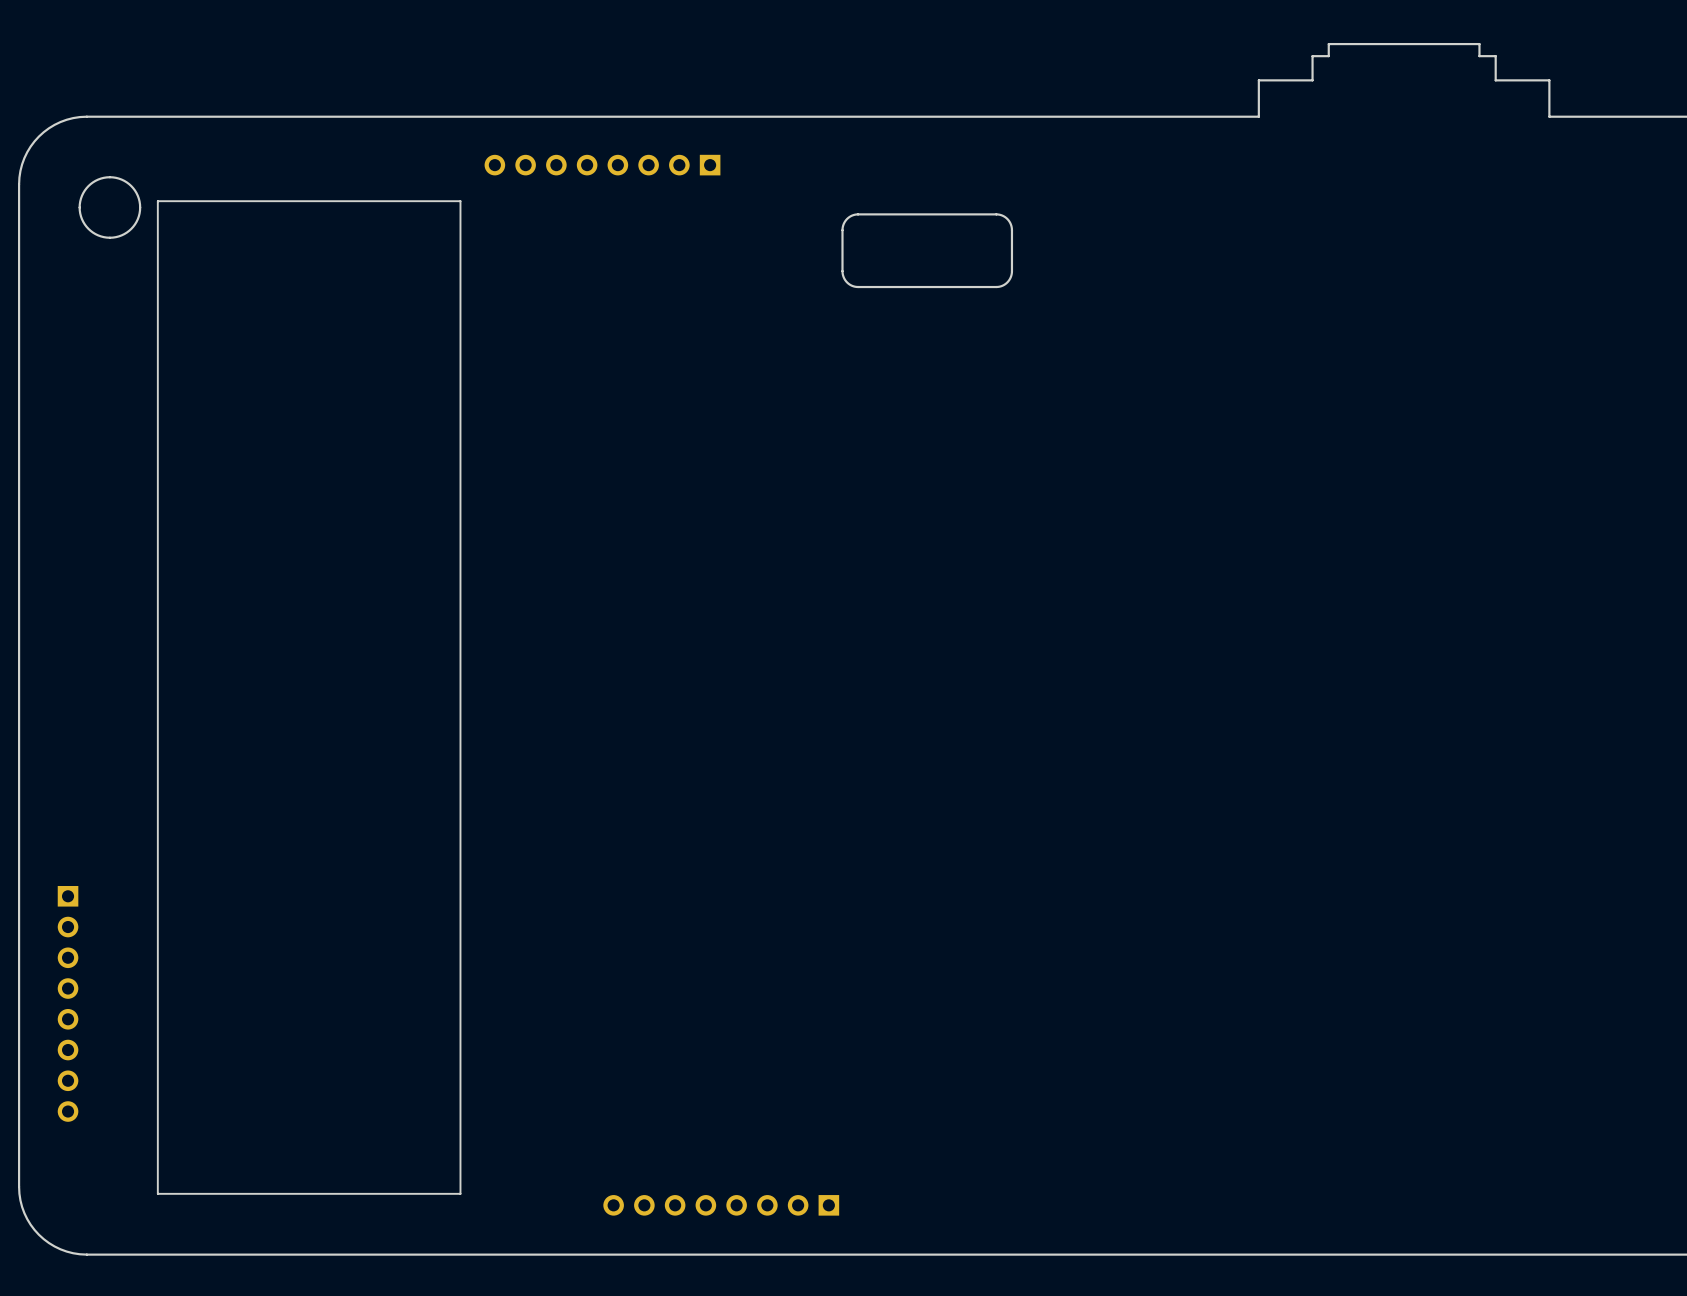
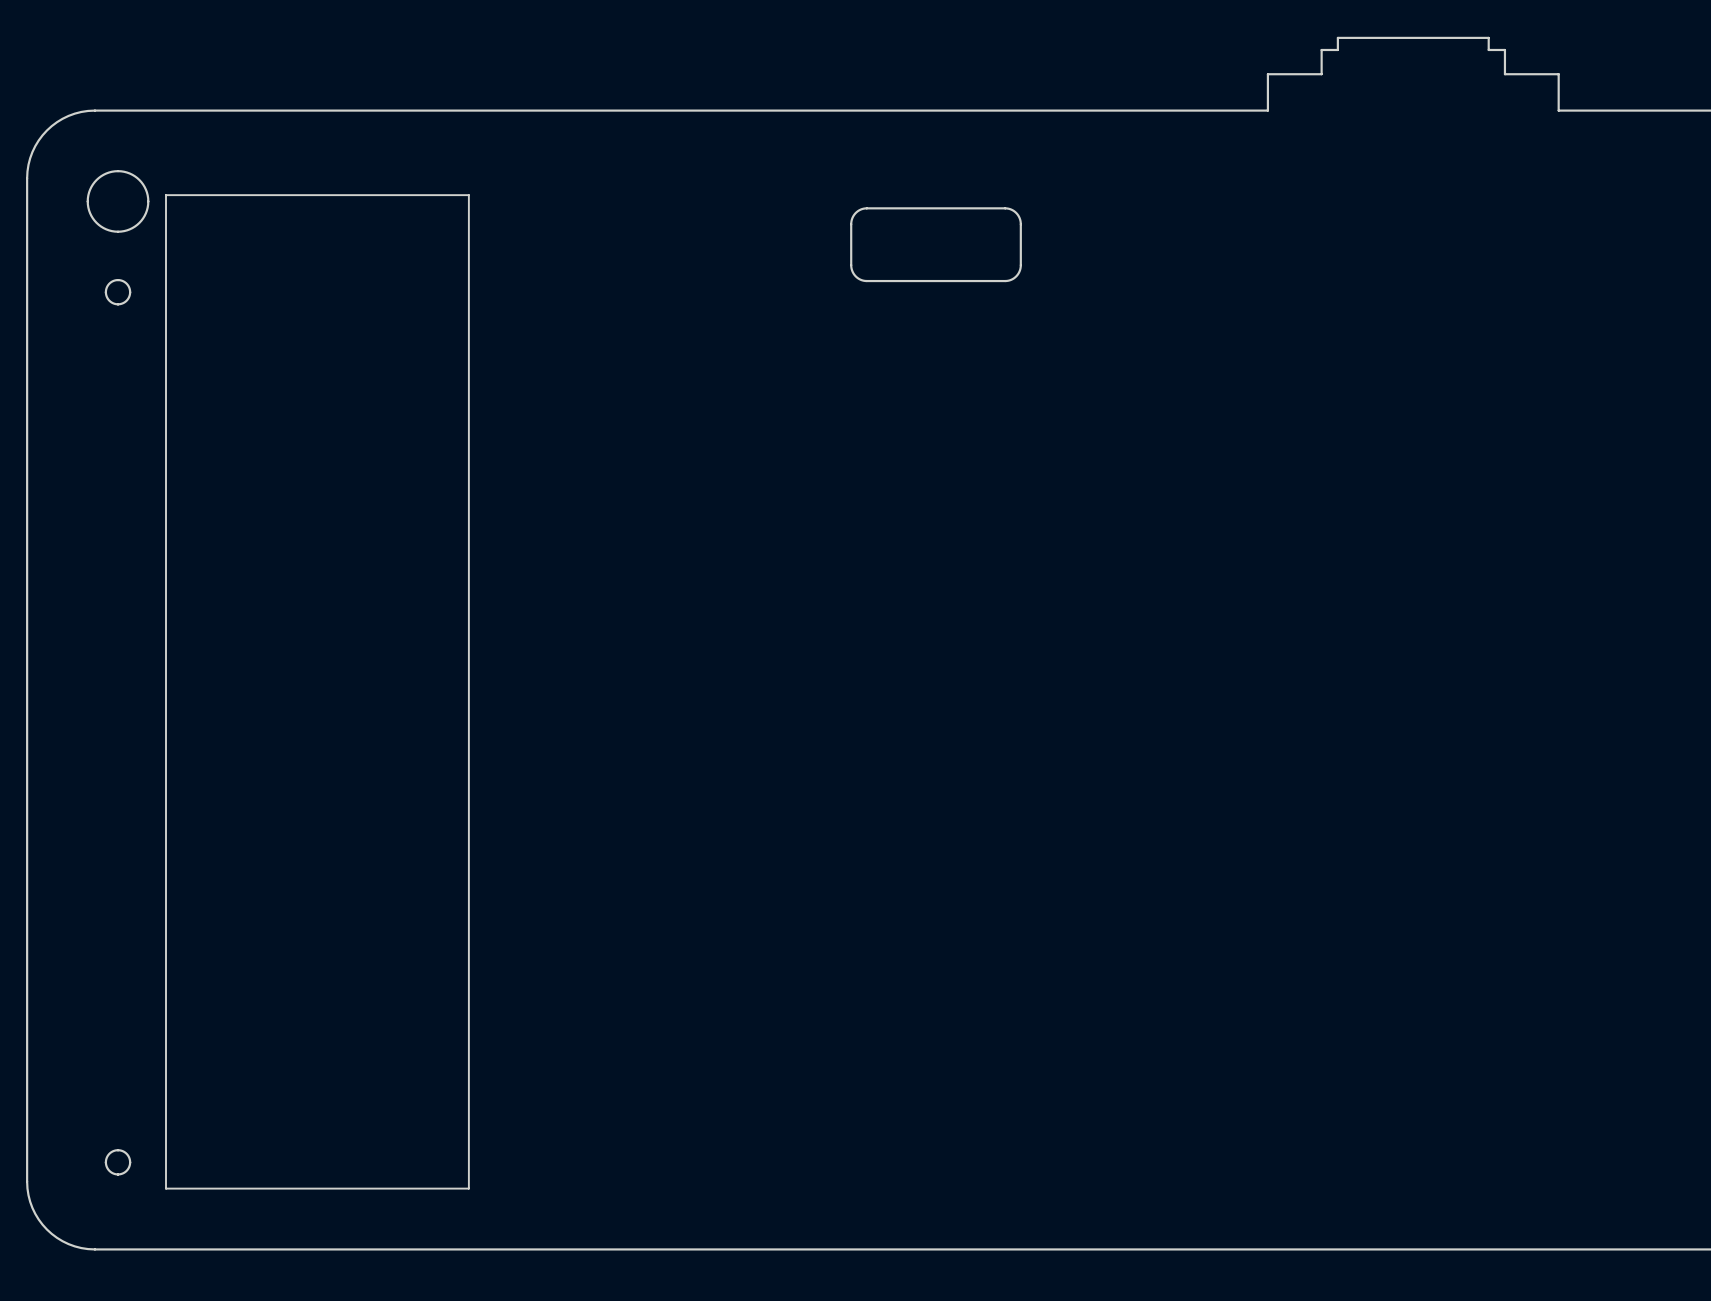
part: (602, 165) -> none
board edge: none -> (118, 280) (109, 283) (105, 292) (109, 300) (118, 304) (126, 300) (130, 292) (126, 283) (118, 280)
part: (68, 1003) -> none
board edge: none -> (118, 1150) (126, 1153) (130, 1162) (126, 1170) (118, 1174) (109, 1170) (105, 1162) (109, 1153) (118, 1150)
part: (721, 1205) -> none

